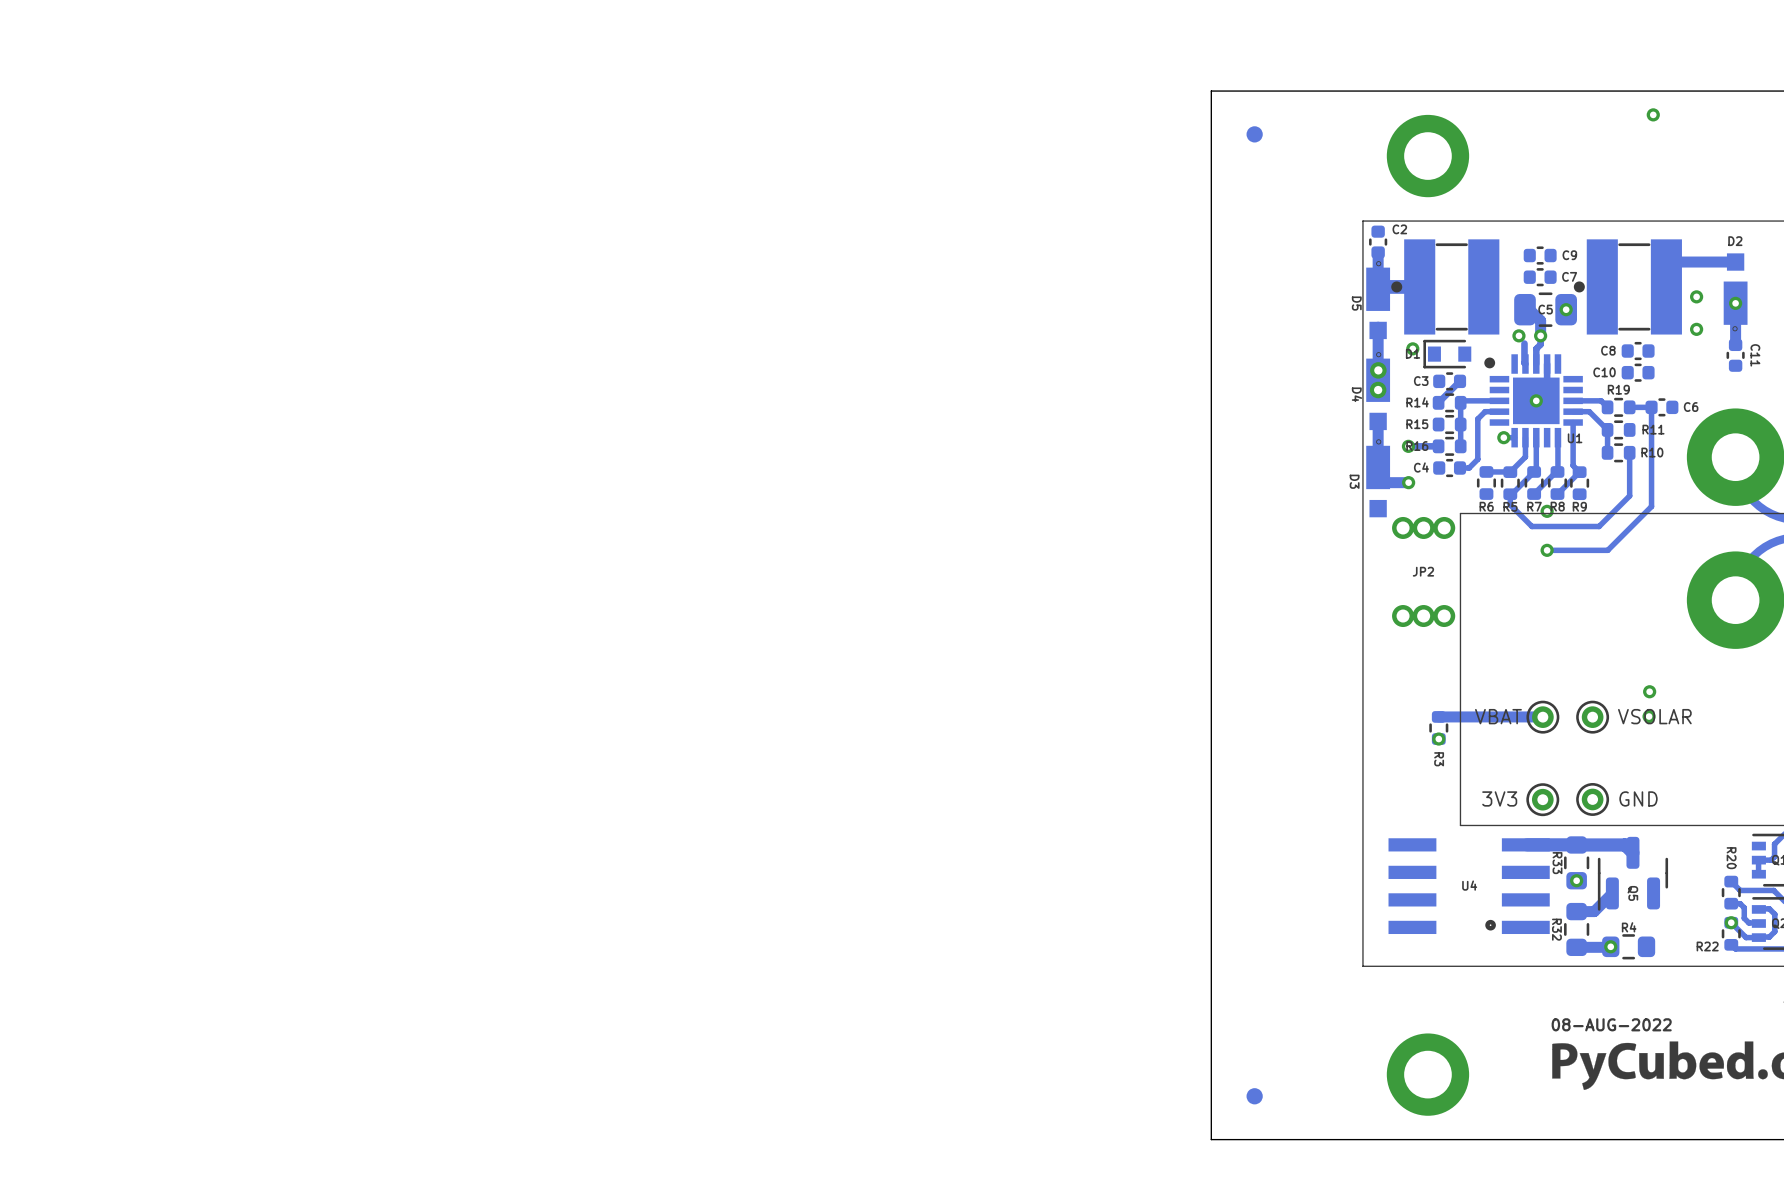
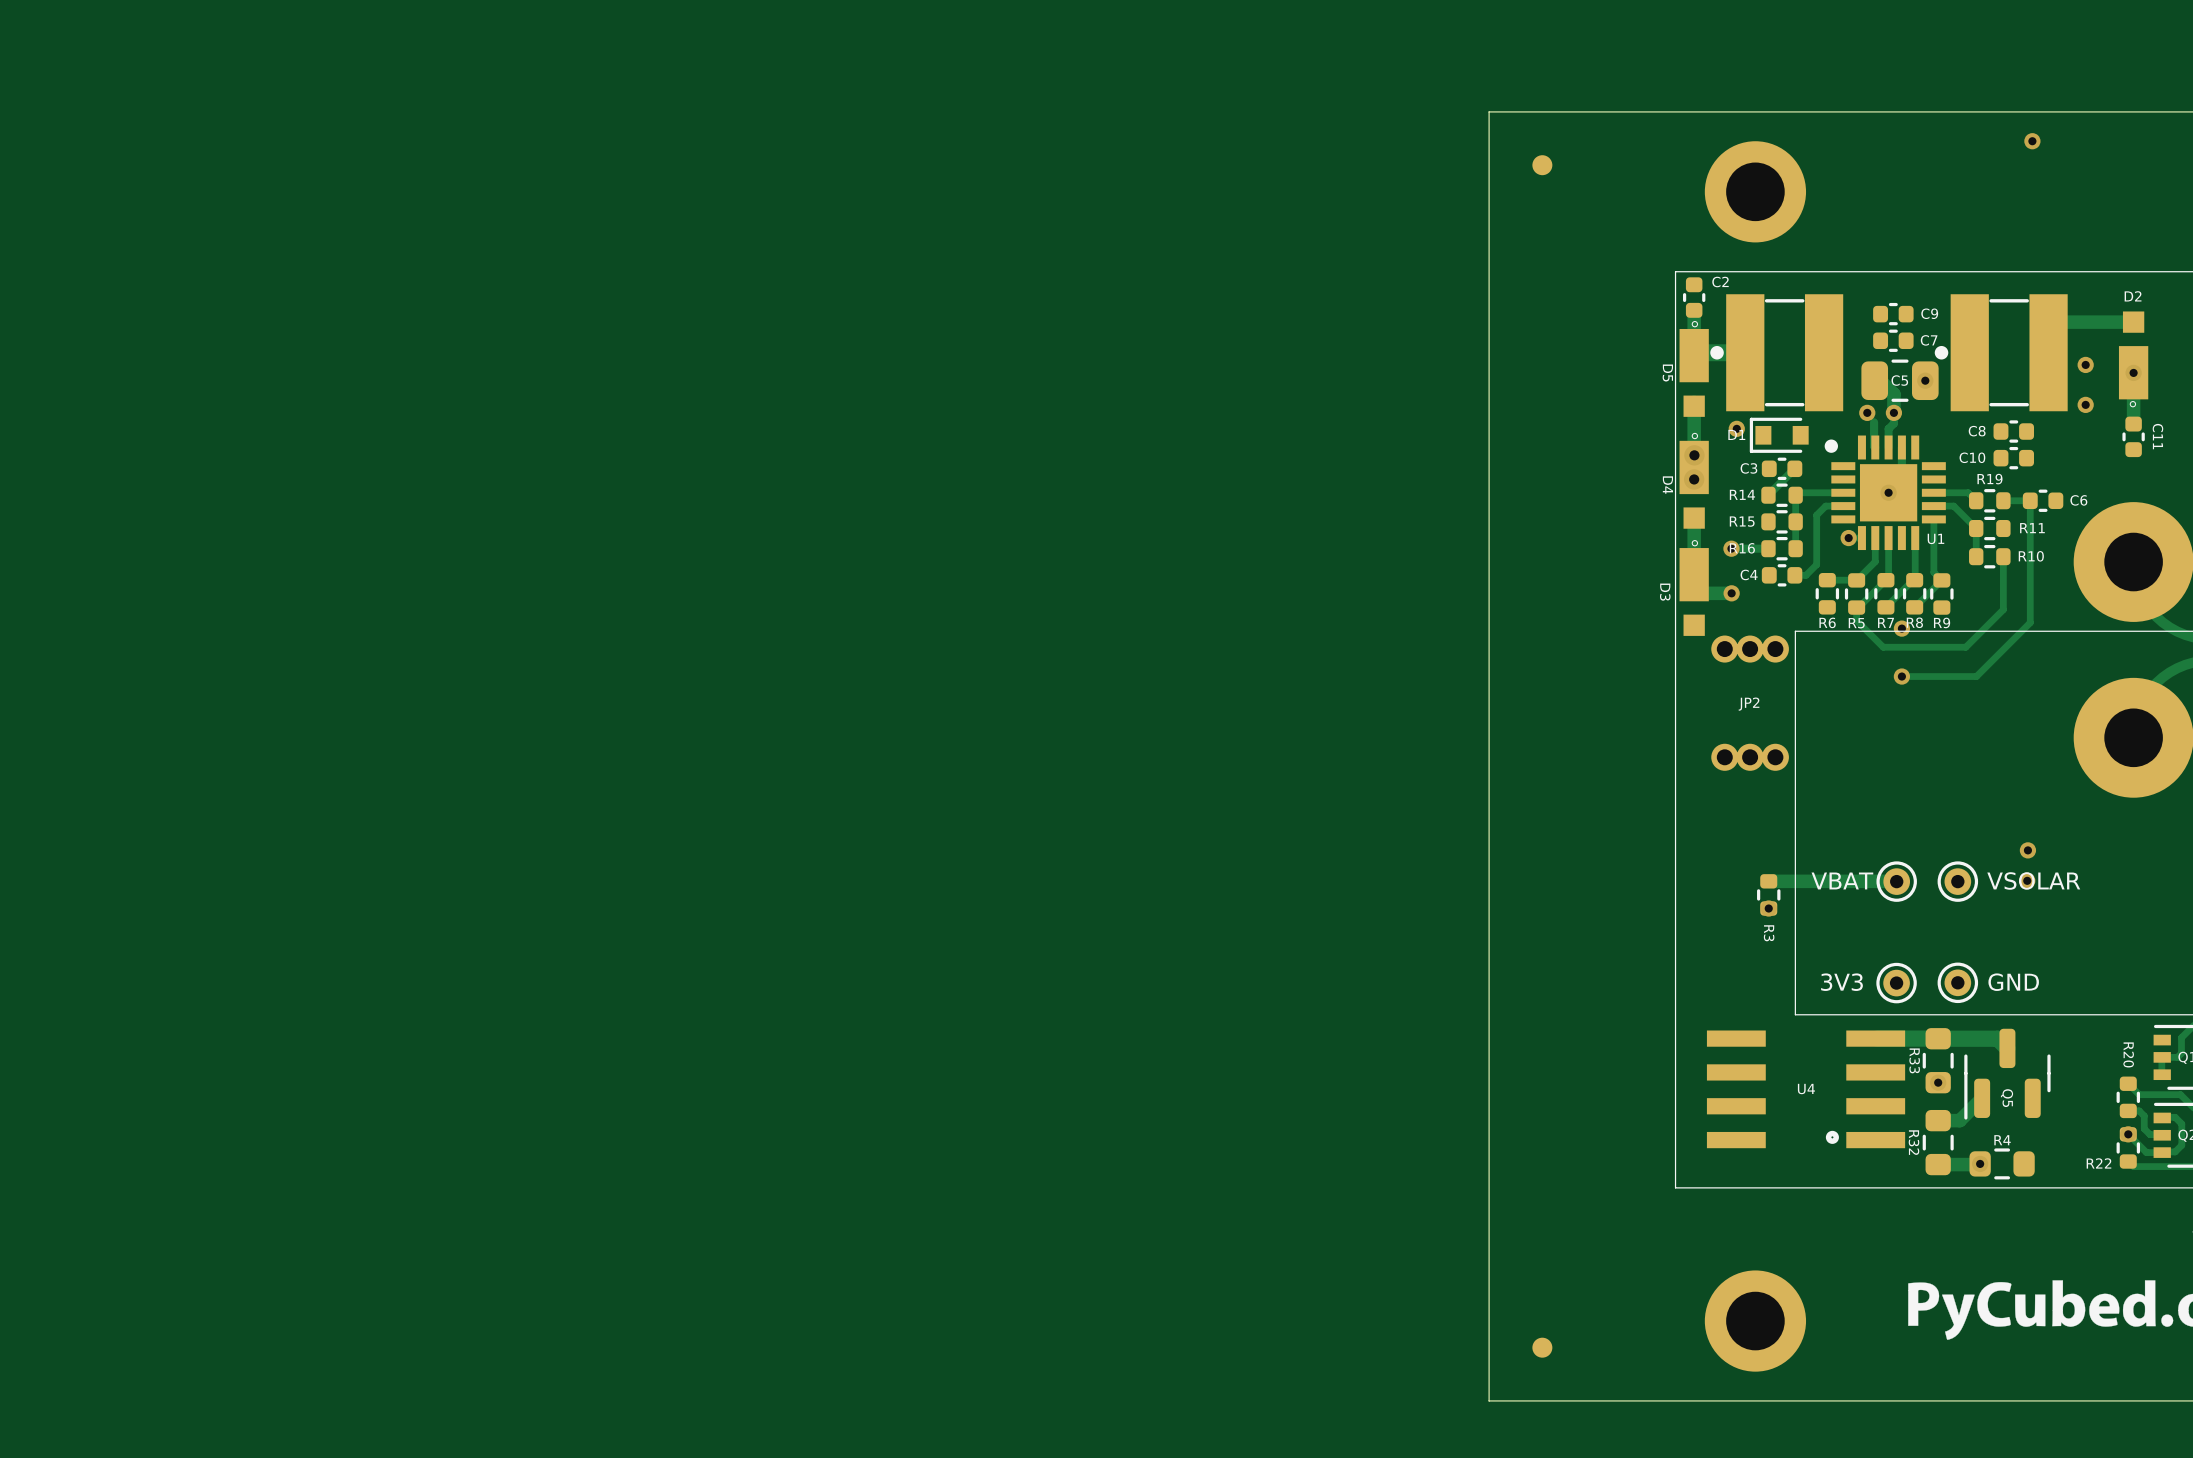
text: 08-AUG-2022 (1611, 1024) -> none

